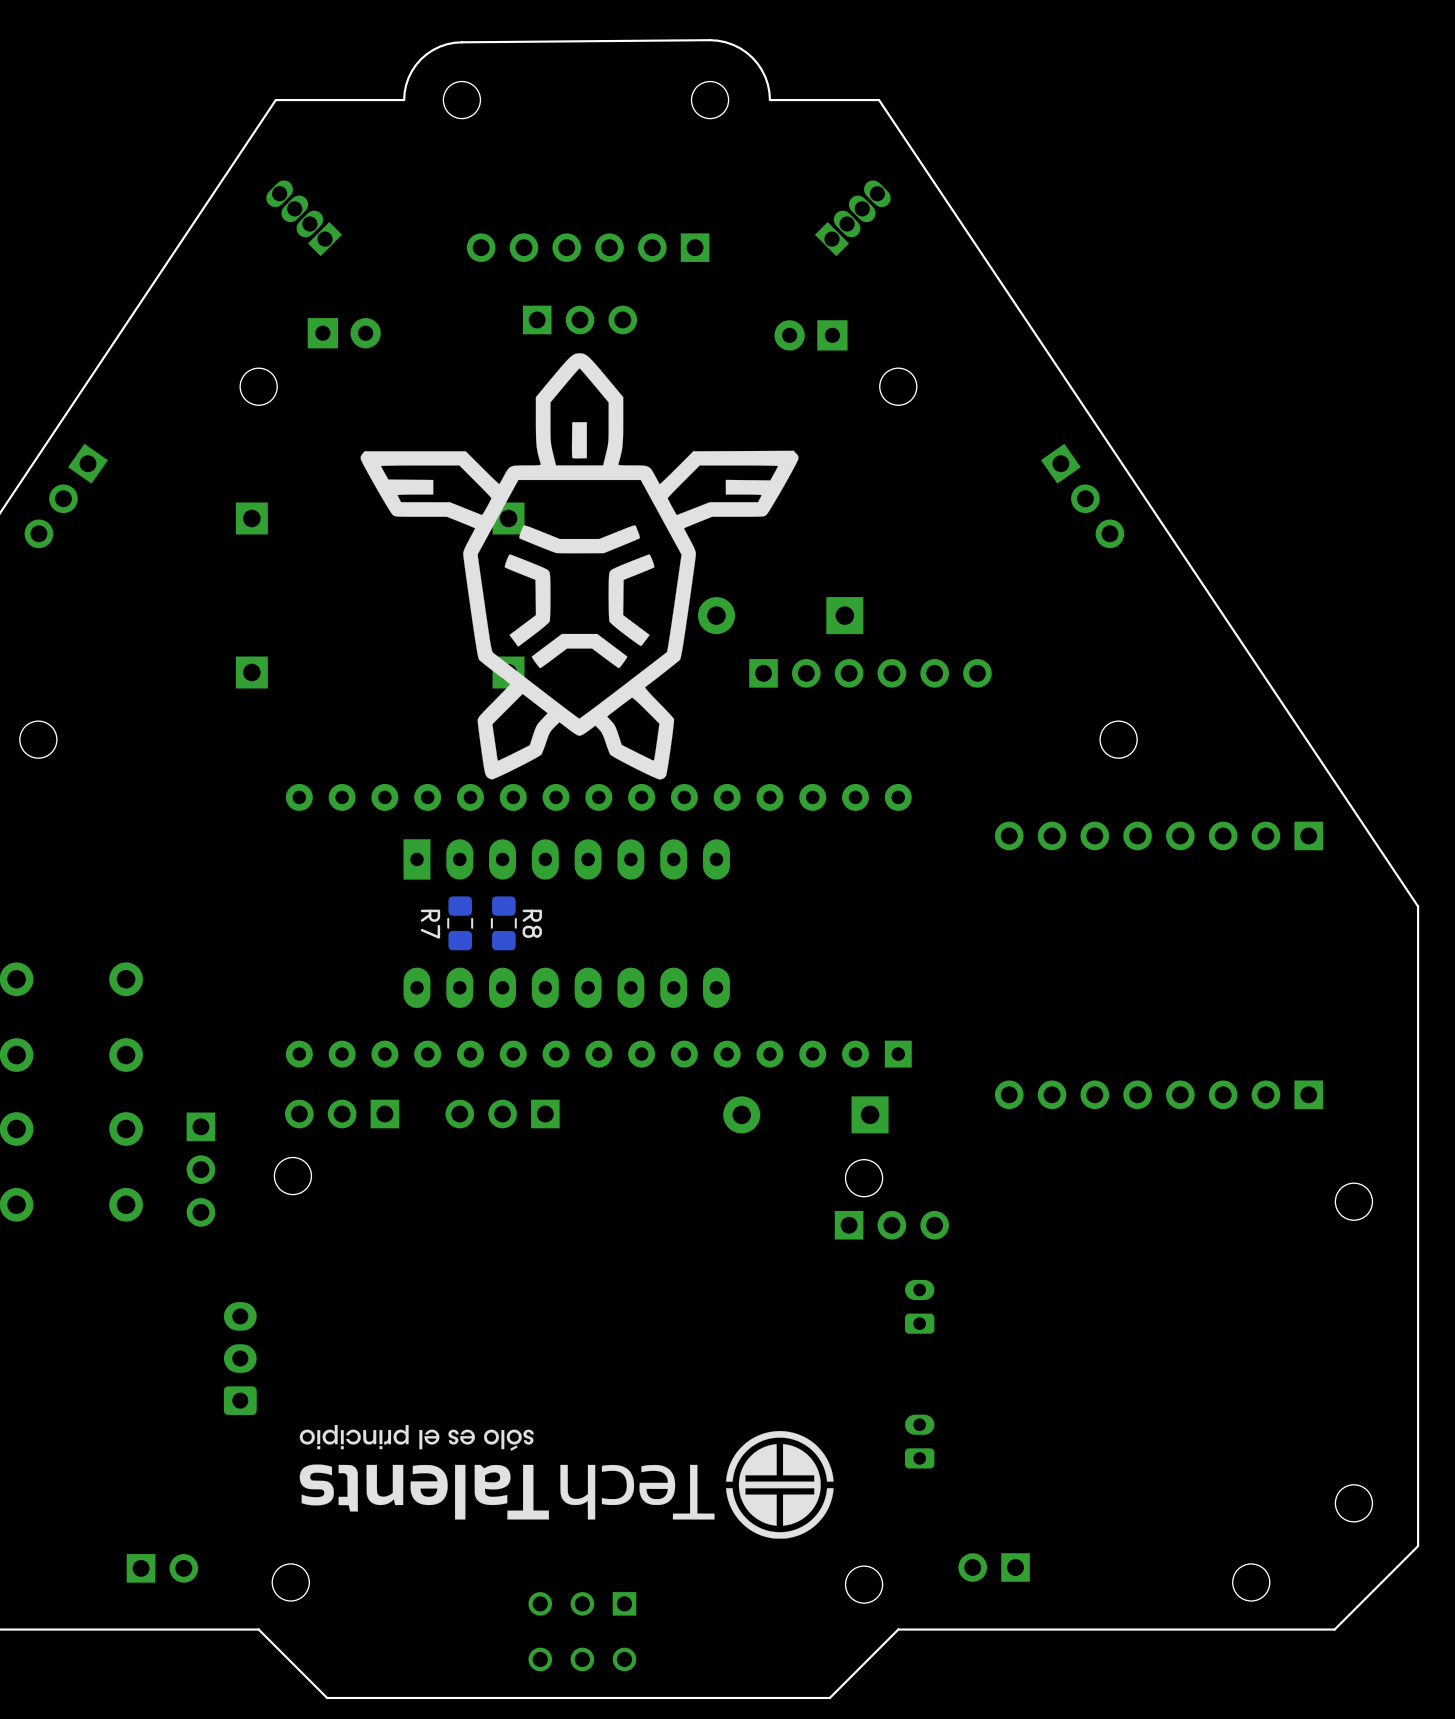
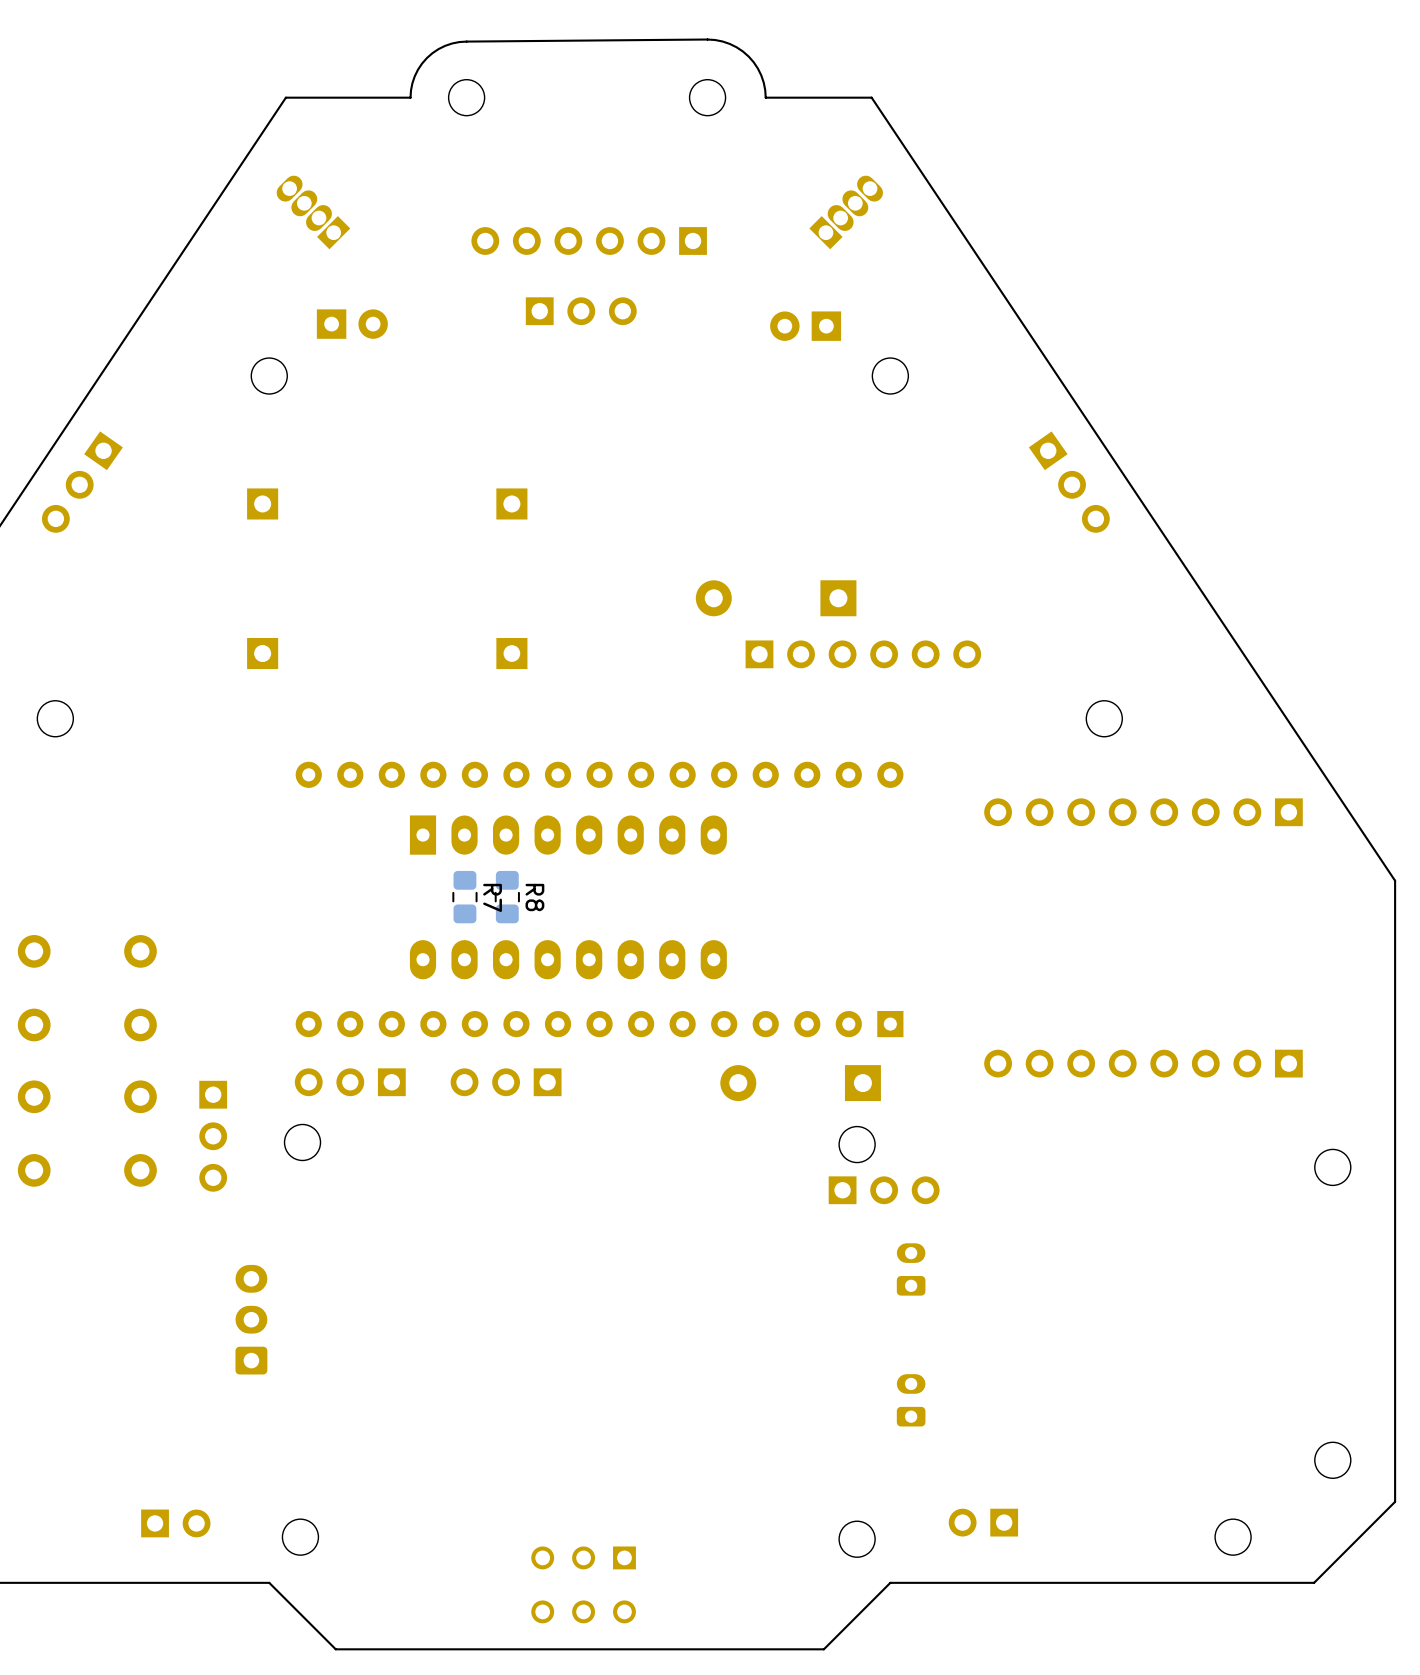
drawing: [360, 353, 799, 780] -> none
R7 name position: R7 (430, 924) -> R7 (492, 897)
drawing: [299, 1424, 834, 1539] -> none

